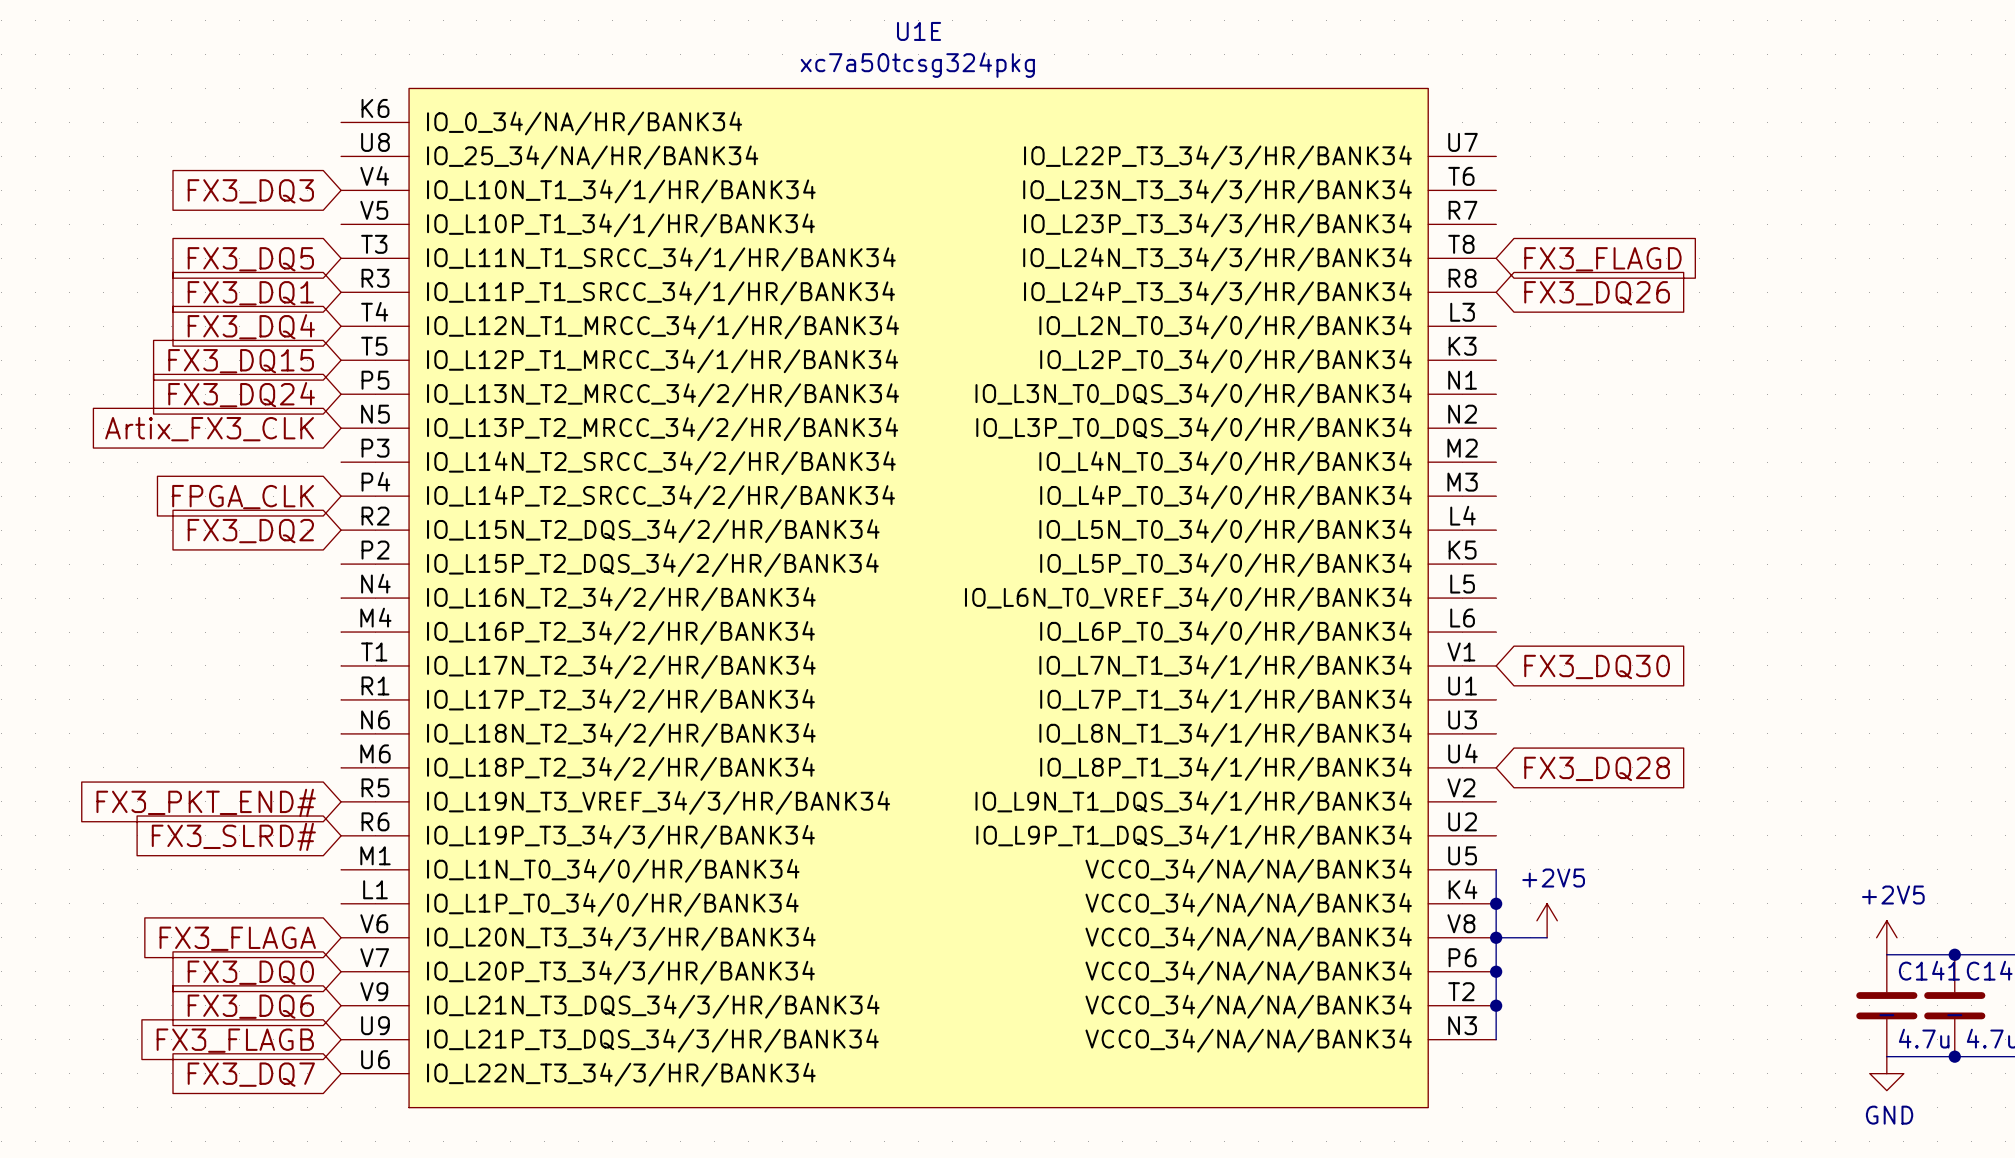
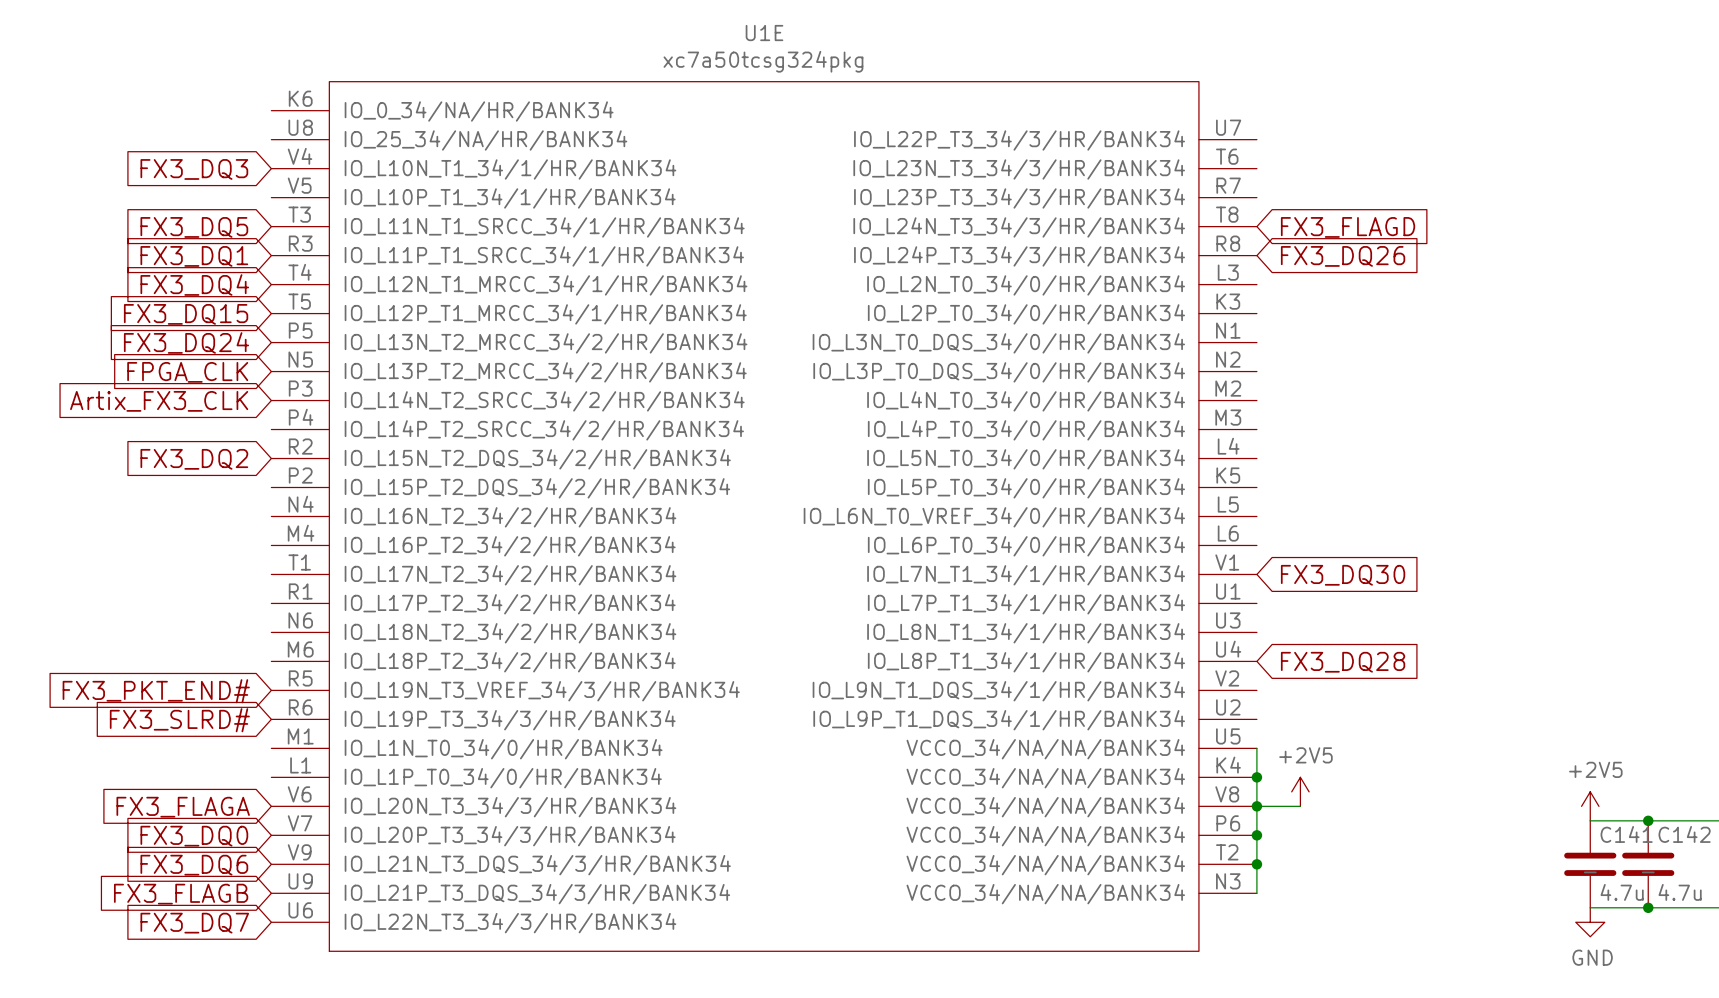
global label: Artix_FX3_CLK (209, 429) -> FPGA_CLK (187, 372)
global label: none -> Artix_FX3_CLK (159, 401)
global label: FPGA_CLK (243, 497) -> none

